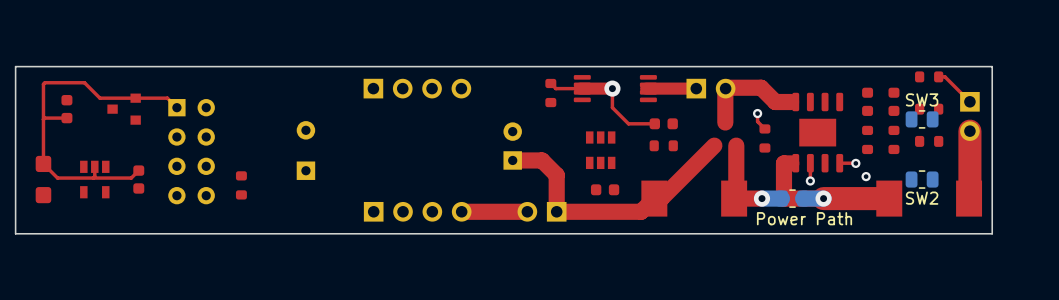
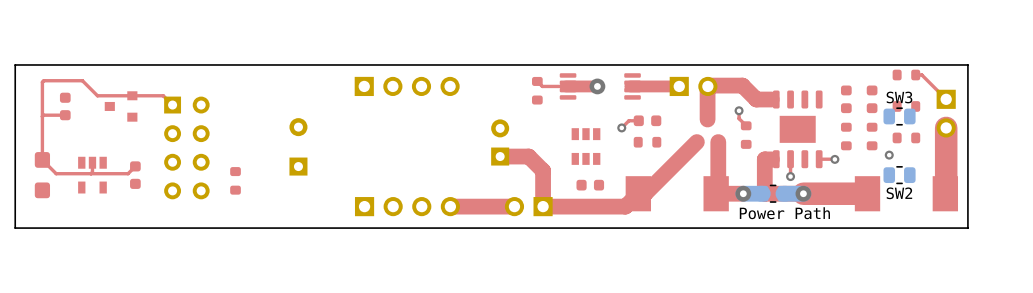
top track: (612, 88) (612, 107) (628, 123) (644, 123) -> (621, 127) (628, 120)
via: none -> (621, 127)
via position: (866, 176) -> (889, 155)

